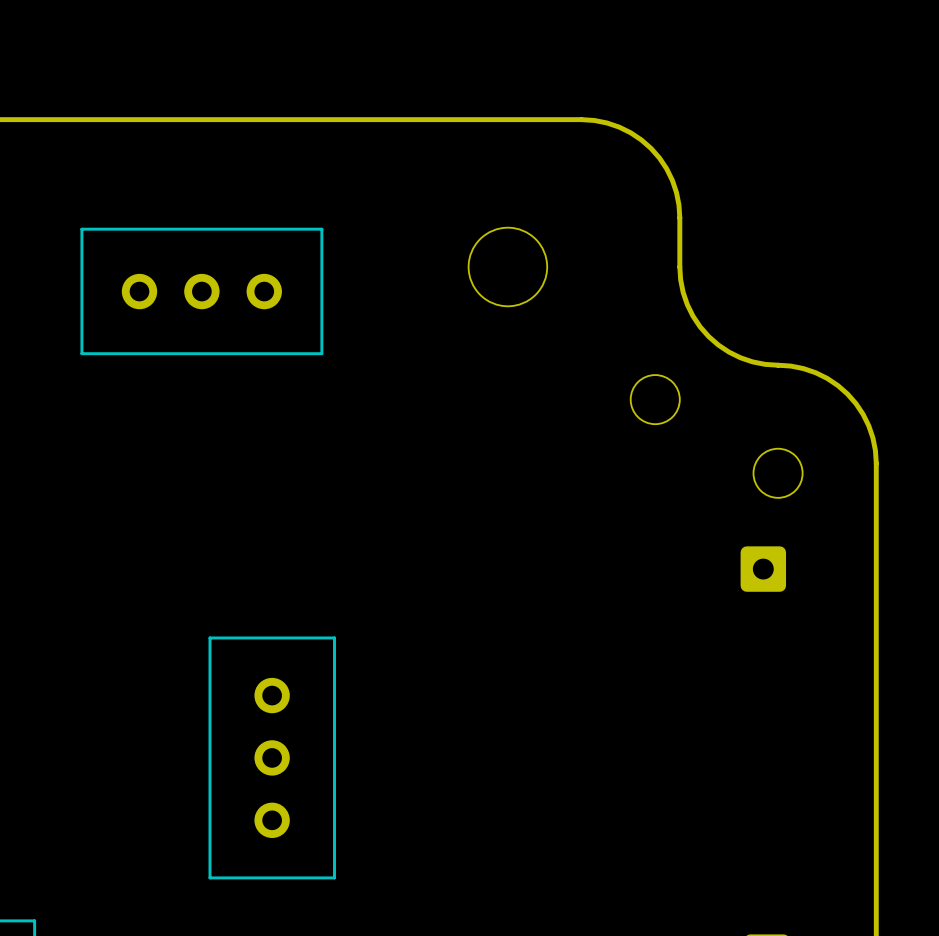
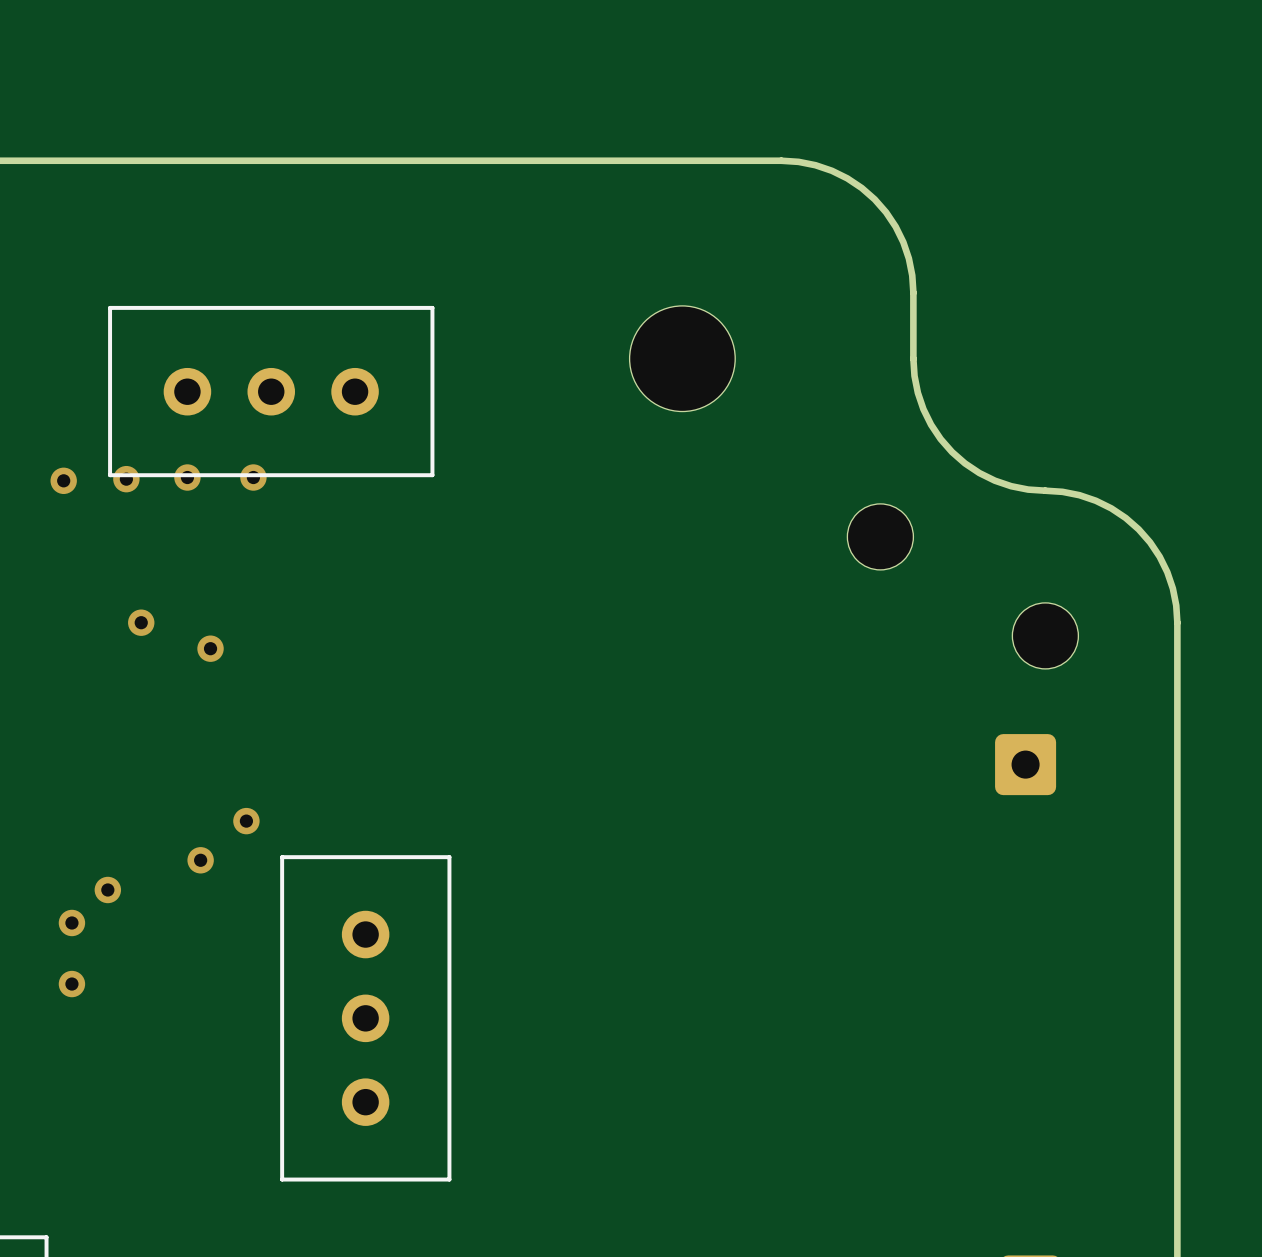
via: none -> (187, 477)
via: none -> (253, 477)
via: none -> (126, 479)
via: none -> (63, 480)
via: none -> (141, 622)
via: none -> (210, 648)
via: none -> (246, 821)
via: none -> (200, 860)
via: none -> (107, 889)
via: none -> (71, 922)
via: none -> (71, 984)

